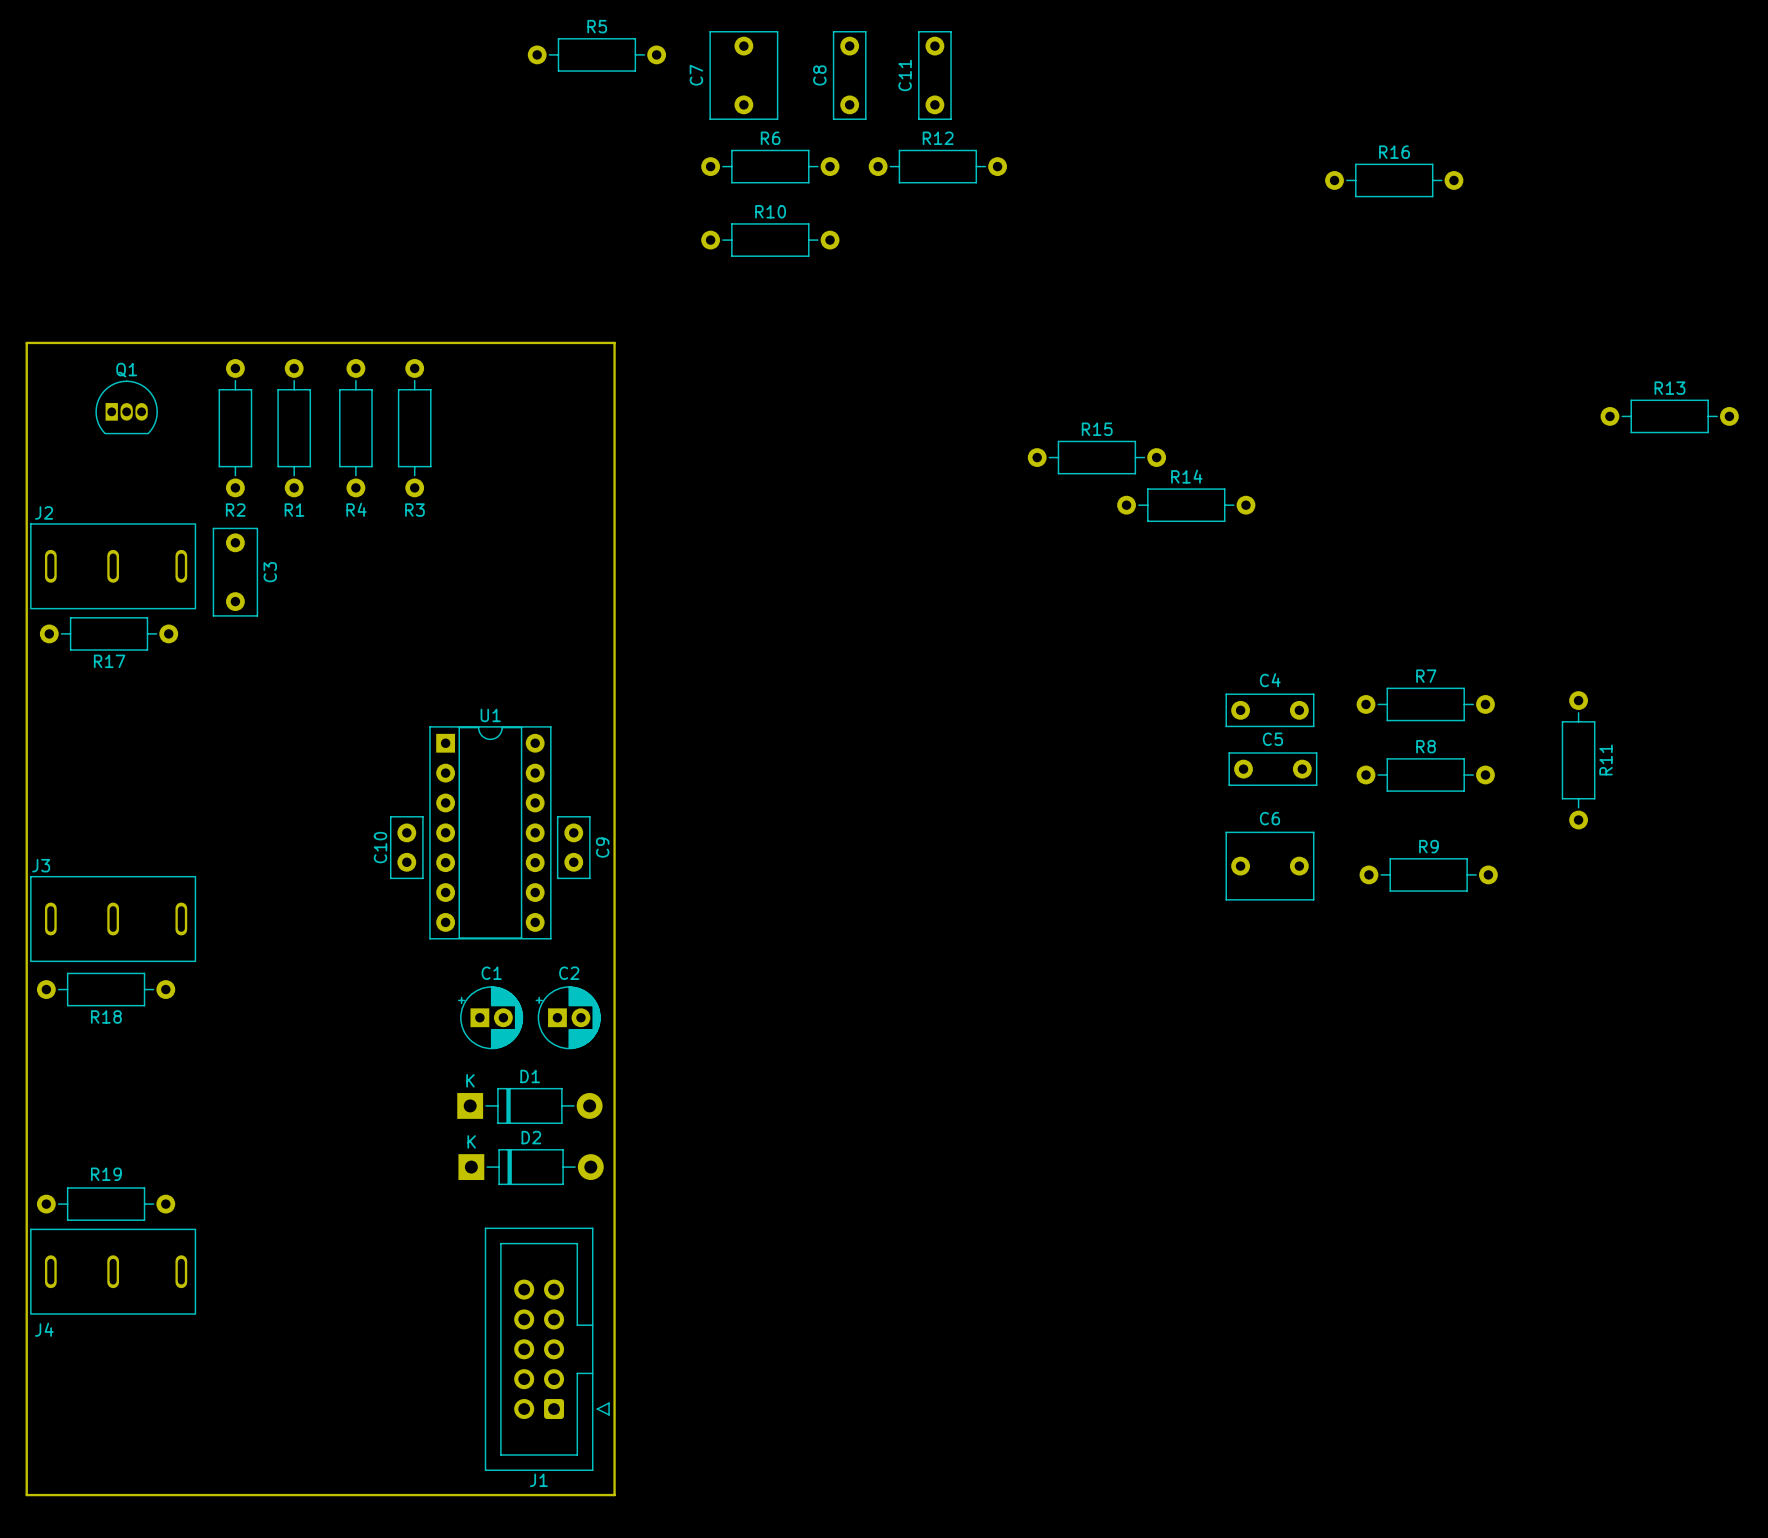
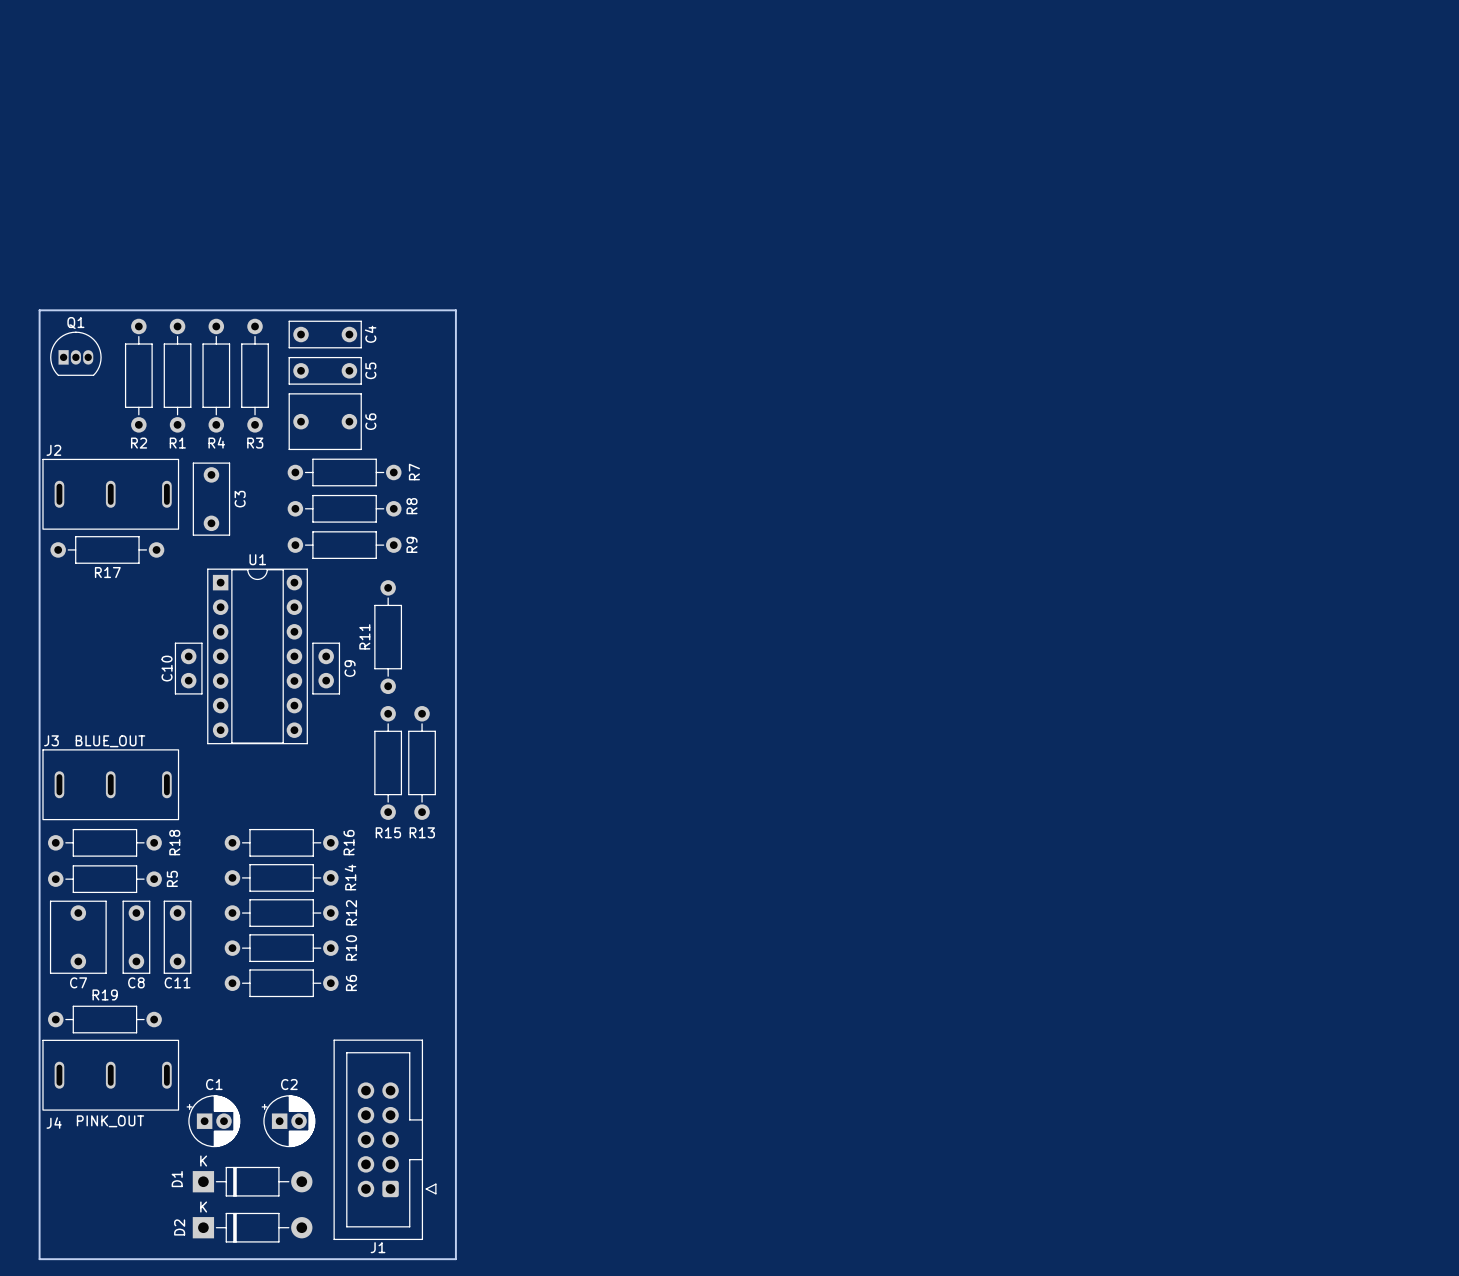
R5 name rotation: 0° (597, 26) -> 90° counterclockwise (172, 878)
R5 name position: R5 (597, 26) -> R5 (172, 878)
R5 position: (596, 54) -> (104, 879)
C7 name rotation: 0° (696, 75) -> 90° clockwise (78, 982)
C7 name position: C7 (696, 75) -> C7 (78, 982)
C7 position: (743, 75) -> (78, 937)
C8 name rotation: 0° (819, 75) -> 90° clockwise (136, 982)
C8 name position: C8 (819, 75) -> C8 (136, 982)
C8 position: (849, 75) -> (136, 937)
C11 name rotation: 0° (905, 75) -> 90° clockwise (177, 982)
C11 name position: C11 (905, 75) -> C11 (177, 982)
C11 position: (934, 75) -> (177, 937)
R6 name rotation: 0° (770, 138) -> 90° counterclockwise (351, 983)
R6 name position: R6 (770, 138) -> R6 (351, 983)
R12 name rotation: 0° (938, 138) -> 90° counterclockwise (351, 912)
R12 name position: R12 (938, 138) -> R12 (351, 912)
R16 name rotation: 0° (1394, 152) -> 90° counterclockwise (349, 842)
R16 name position: R16 (1394, 152) -> R16 (349, 842)
R6 position: (770, 166) -> (281, 983)
R12 position: (937, 166) -> (281, 913)
R16 position: (1394, 180) -> (281, 842)
R10 name rotation: 0° (770, 211) -> 90° counterclockwise (351, 947)
R10 name position: R10 (770, 211) -> R10 (351, 947)
R10 position: (770, 240) -> (281, 948)
board edge: (532, 342) (614, 342) (614, 1495) (532, 1495) -> (455, 310) (455, 1259)
R13 name position: R13 (1669, 388) -> R13 (422, 832)
Q1 position: (126, 407) -> (75, 353)
R13 rotation: 0° (1669, 416) -> 90° clockwise (422, 762)
R13 position: (1669, 416) -> (422, 762)
R2 position: (235, 428) -> (138, 375)
R1 position: (294, 428) -> (177, 375)
R4 position: (355, 428) -> (216, 375)
R3 position: (414, 428) -> (255, 375)
R15 name position: R15 (1097, 429) -> R15 (388, 832)
R15 rotation: 0° (1096, 457) -> 90° clockwise (388, 762)
R15 position: (1096, 457) -> (388, 762)
R14 name rotation: 0° (1186, 476) -> 90° counterclockwise (350, 877)
R14 name position: R14 (1186, 476) -> R14 (350, 877)
R14 position: (1186, 505) -> (281, 877)
R7 name rotation: 0° (1426, 676) -> 90° counterclockwise (414, 472)
R7 name position: R7 (1426, 676) -> R7 (414, 472)
C4 name rotation: 0° (1270, 680) -> 90° counterclockwise (370, 334)
C4 name position: C4 (1270, 680) -> C4 (370, 334)
R7 position: (1425, 704) -> (344, 472)
C4 position: (1269, 710) -> (325, 334)
C5 name rotation: 0° (1272, 739) -> 90° counterclockwise (370, 370)
C5 name position: C5 (1272, 739) -> C5 (370, 370)
R8 name rotation: 0° (1426, 746) -> 90° counterclockwise (411, 506)
R8 name position: R8 (1426, 746) -> R8 (411, 506)
R11 position: (1578, 760) -> (388, 637)
R11 name position: R11 (1606, 760) -> R11 (364, 636)
C5 position: (1272, 769) -> (325, 370)
R8 position: (1425, 774) -> (344, 508)
C6 name rotation: 0° (1269, 818) -> 90° counterclockwise (370, 421)
C6 name position: C6 (1269, 818) -> C6 (370, 421)
U1 position: (490, 832) -> (257, 656)
R9 name rotation: 0° (1428, 846) -> 90° counterclockwise (411, 544)
R9 name position: R9 (1428, 846) -> R9 (411, 544)
C10 position: (406, 847) -> (188, 668)
C9 position: (573, 847) -> (326, 668)
J3 value: none -> BLUE_OUT (110, 741)
C6 position: (1269, 866) -> (325, 421)
R9 position: (1428, 874) -> (344, 545)
R18 name rotation: 0° (106, 1016) -> 90° counterclockwise (174, 842)
R18 name position: R18 (106, 1016) -> R18 (174, 842)
C1 position: (490, 1017) -> (213, 1121)
C2 position: (568, 1017) -> (288, 1121)
D1 name rotation: 0° (530, 1076) -> 90° counterclockwise (177, 1179)
D1 name position: D1 (530, 1076) -> D1 (177, 1179)
D1 position: (529, 1105) -> (252, 1181)
D2 name rotation: 0° (531, 1137) -> 90° counterclockwise (179, 1227)
D2 name position: D2 (531, 1137) -> D2 (179, 1227)
D2 position: (531, 1167) -> (252, 1227)
J4 value: none -> PINK_OUT (110, 1121)
J1 position: (547, 1349) -> (385, 1139)

